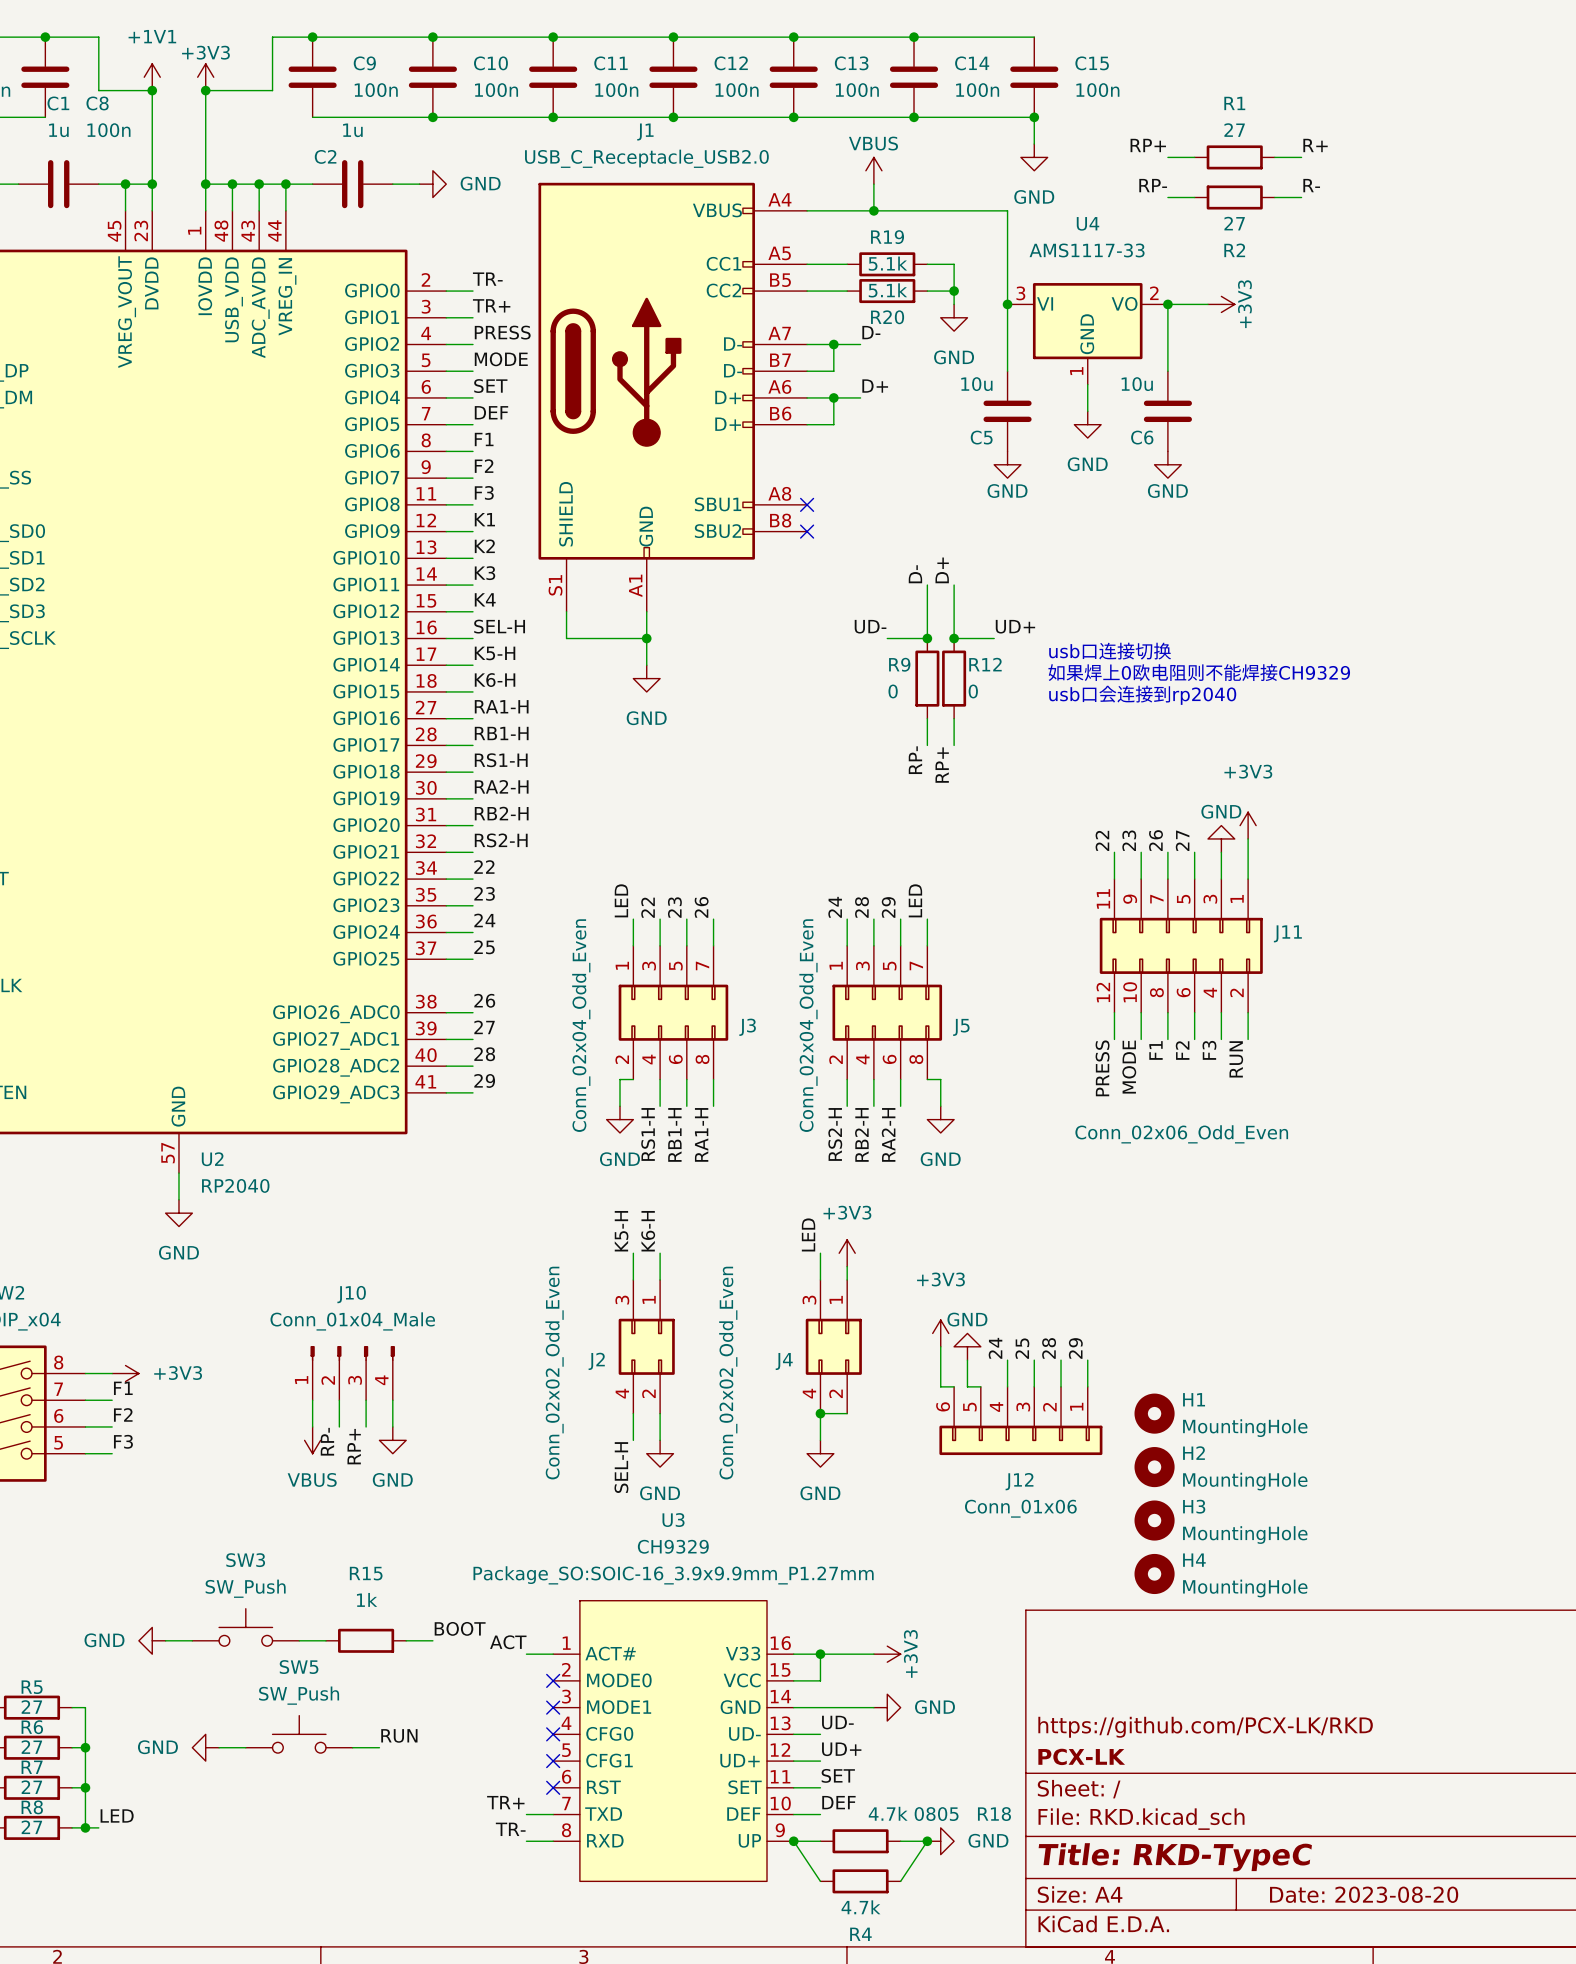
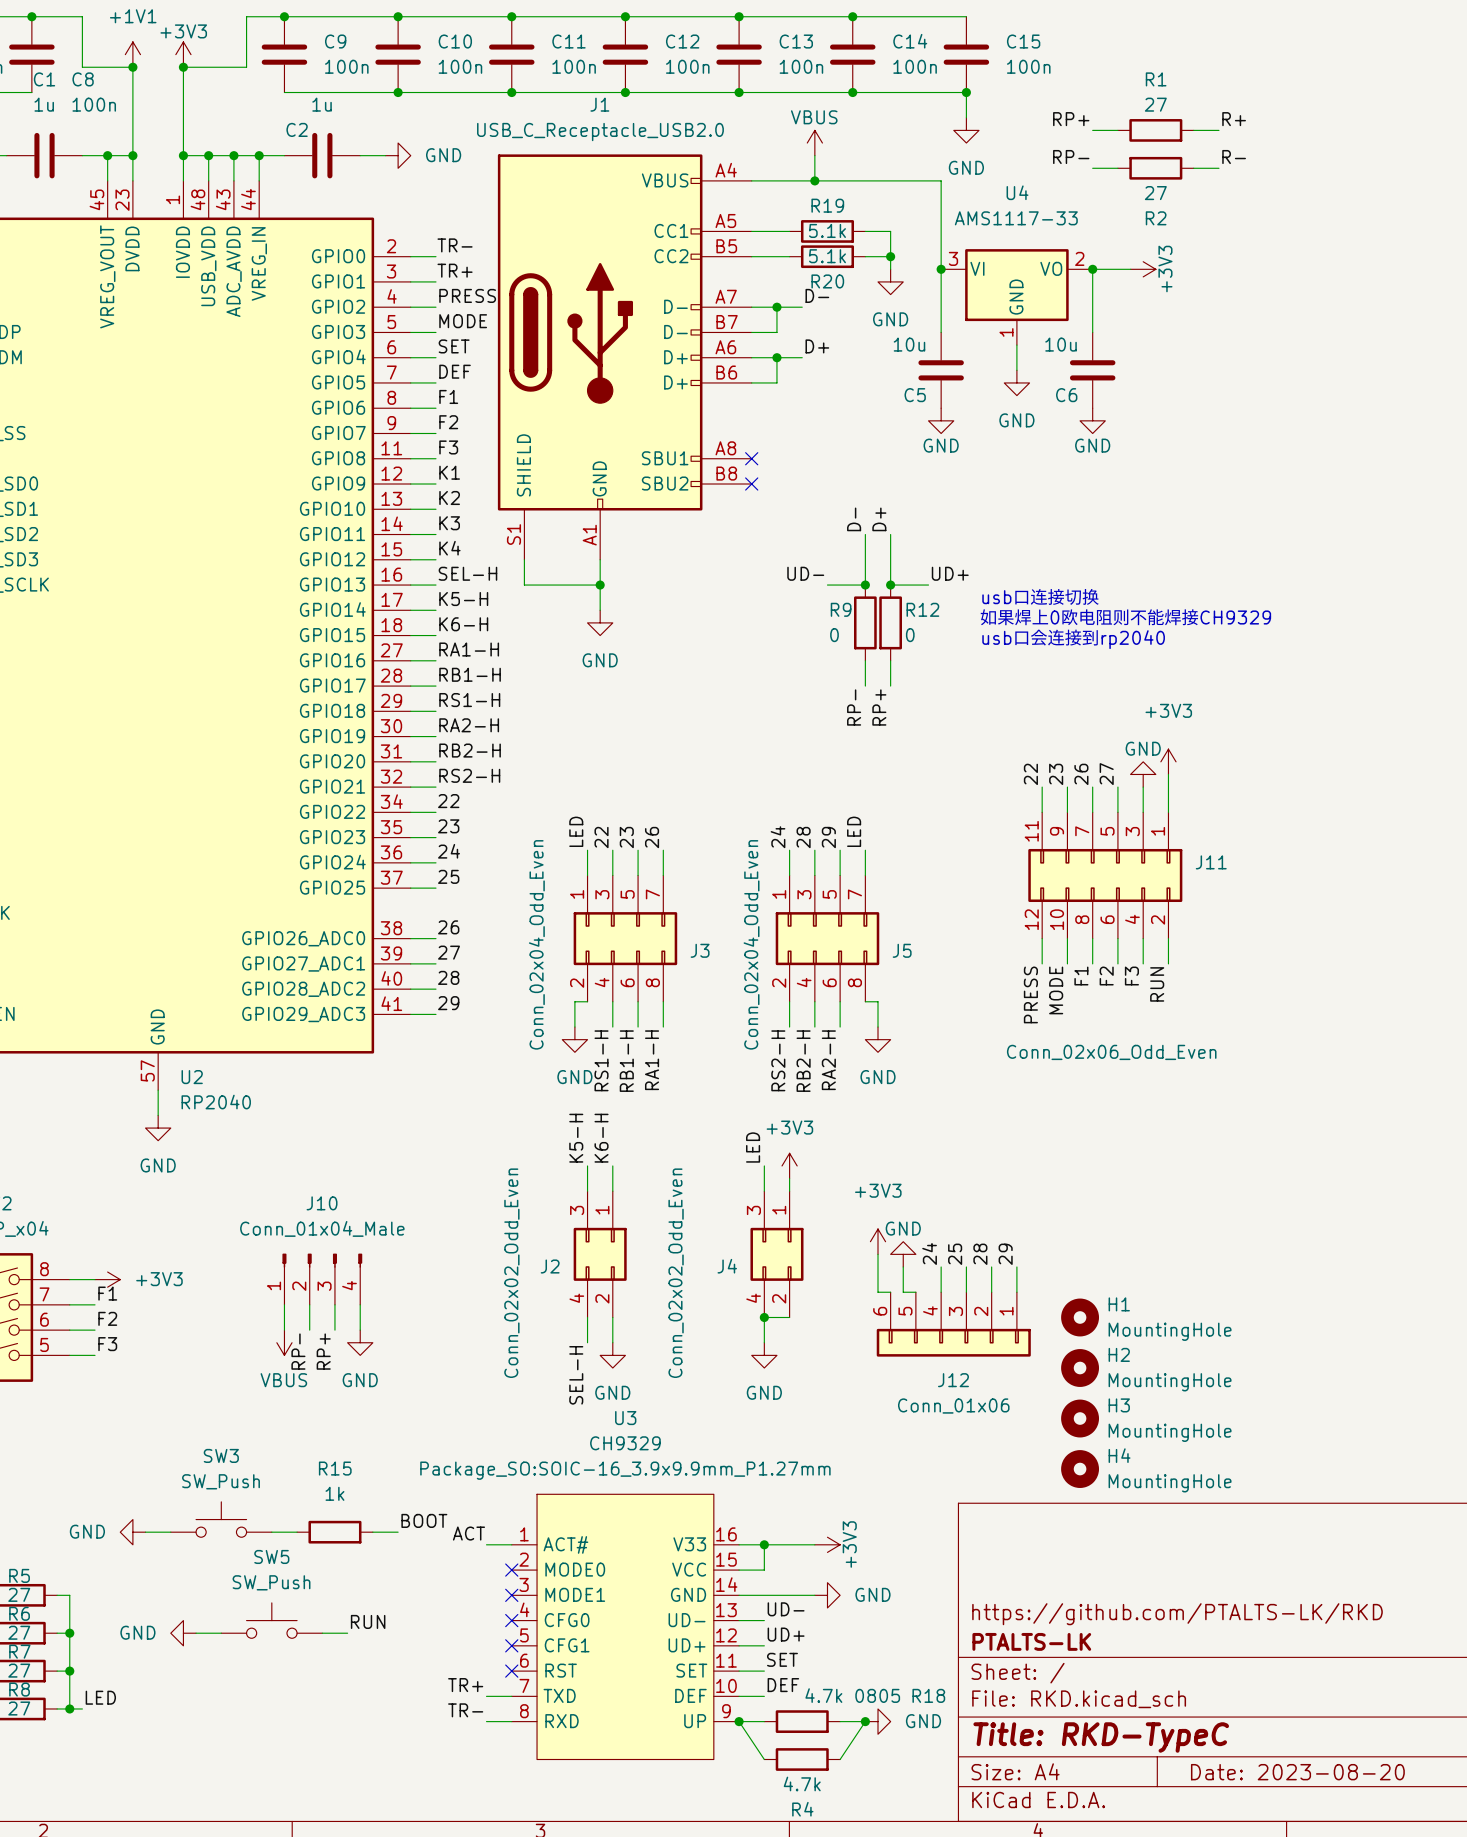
title block: https://github.com/PCX-LK/RKD (1205, 1727) -> https://github.com/PTALTS-LK/RKD (1177, 1614)
title block: PCX-LK (1081, 1756) -> PTALTS-LK (1031, 1641)

